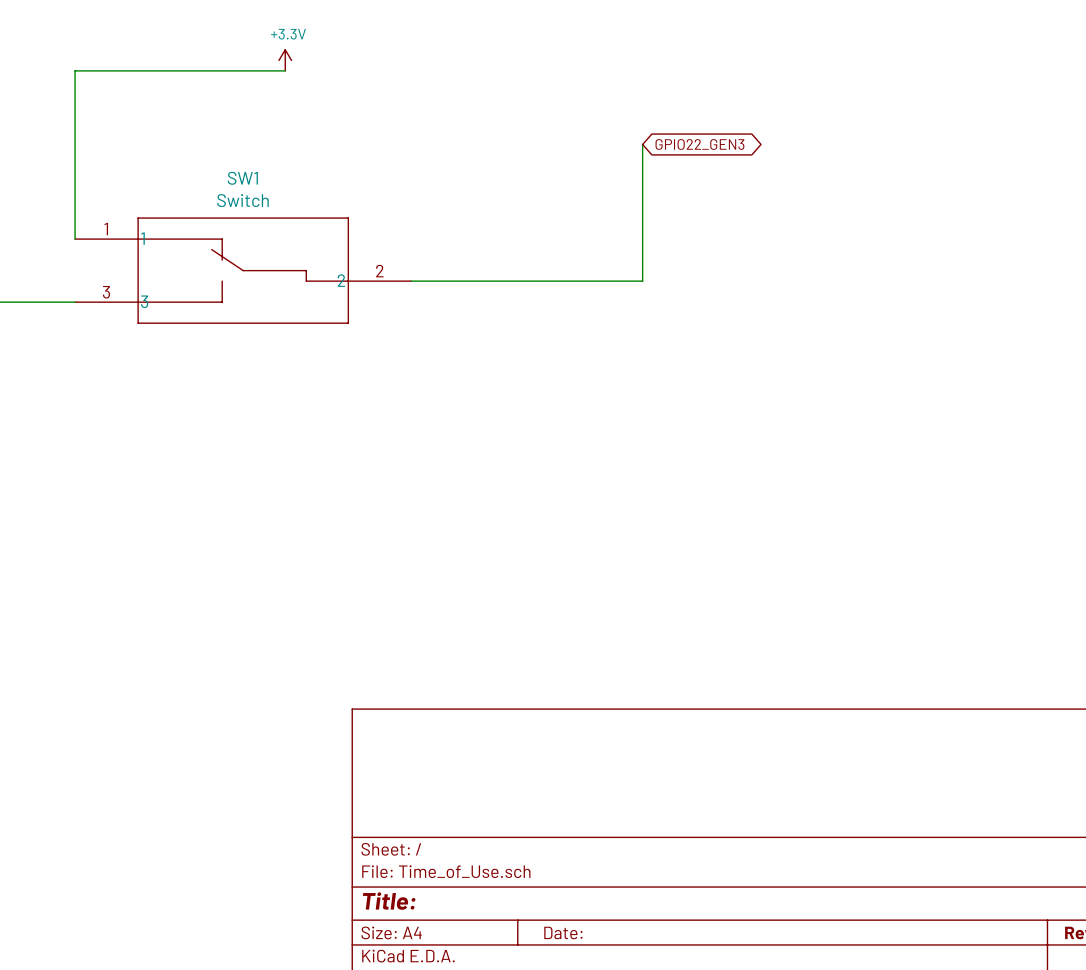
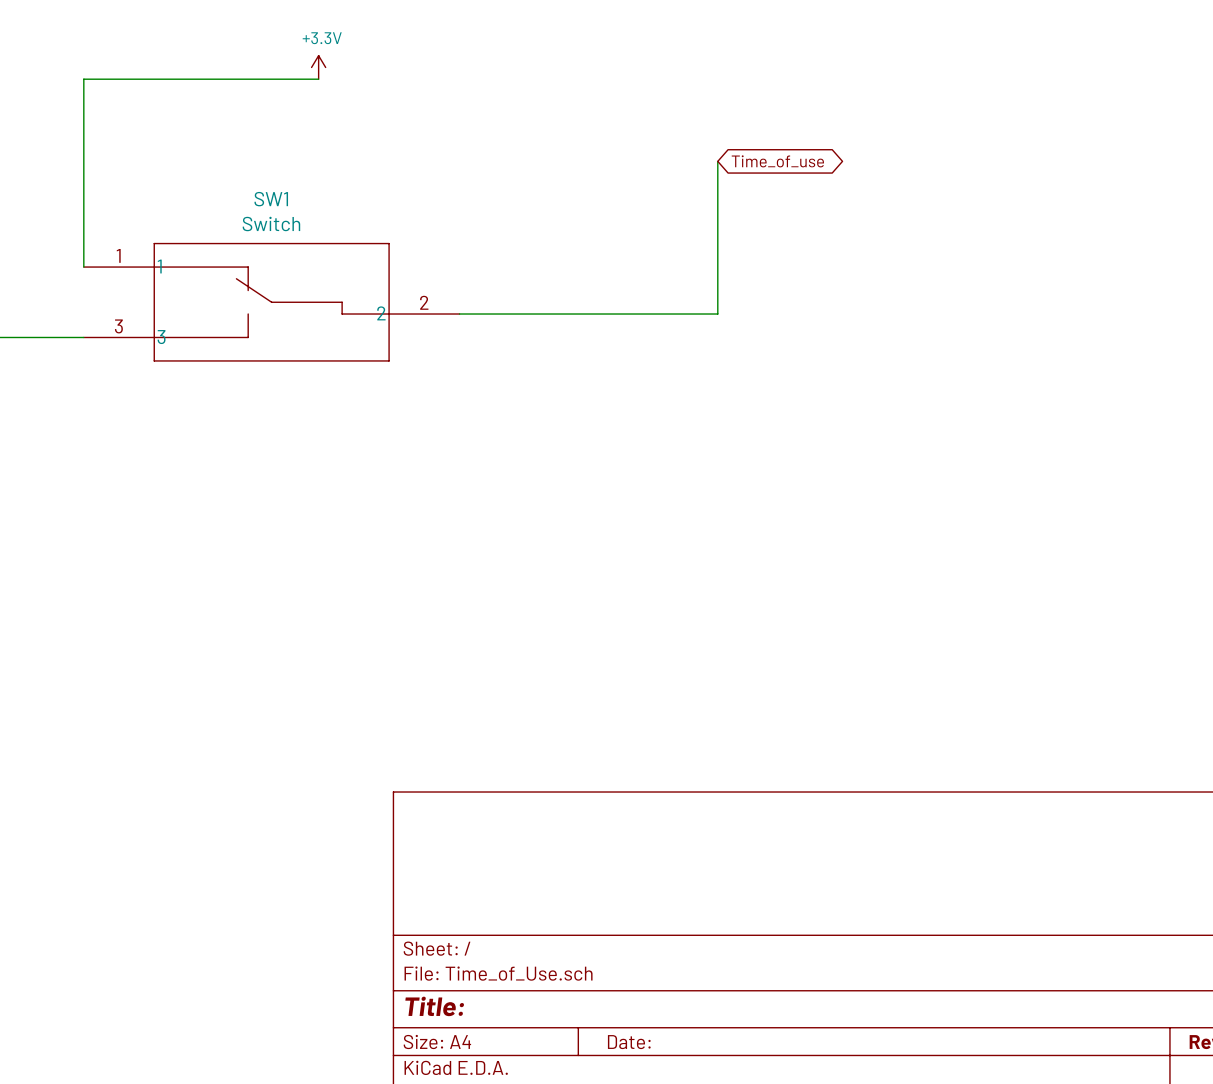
global label: GPIO22_GEN3 (699, 144) -> Time_of_use (777, 161)

